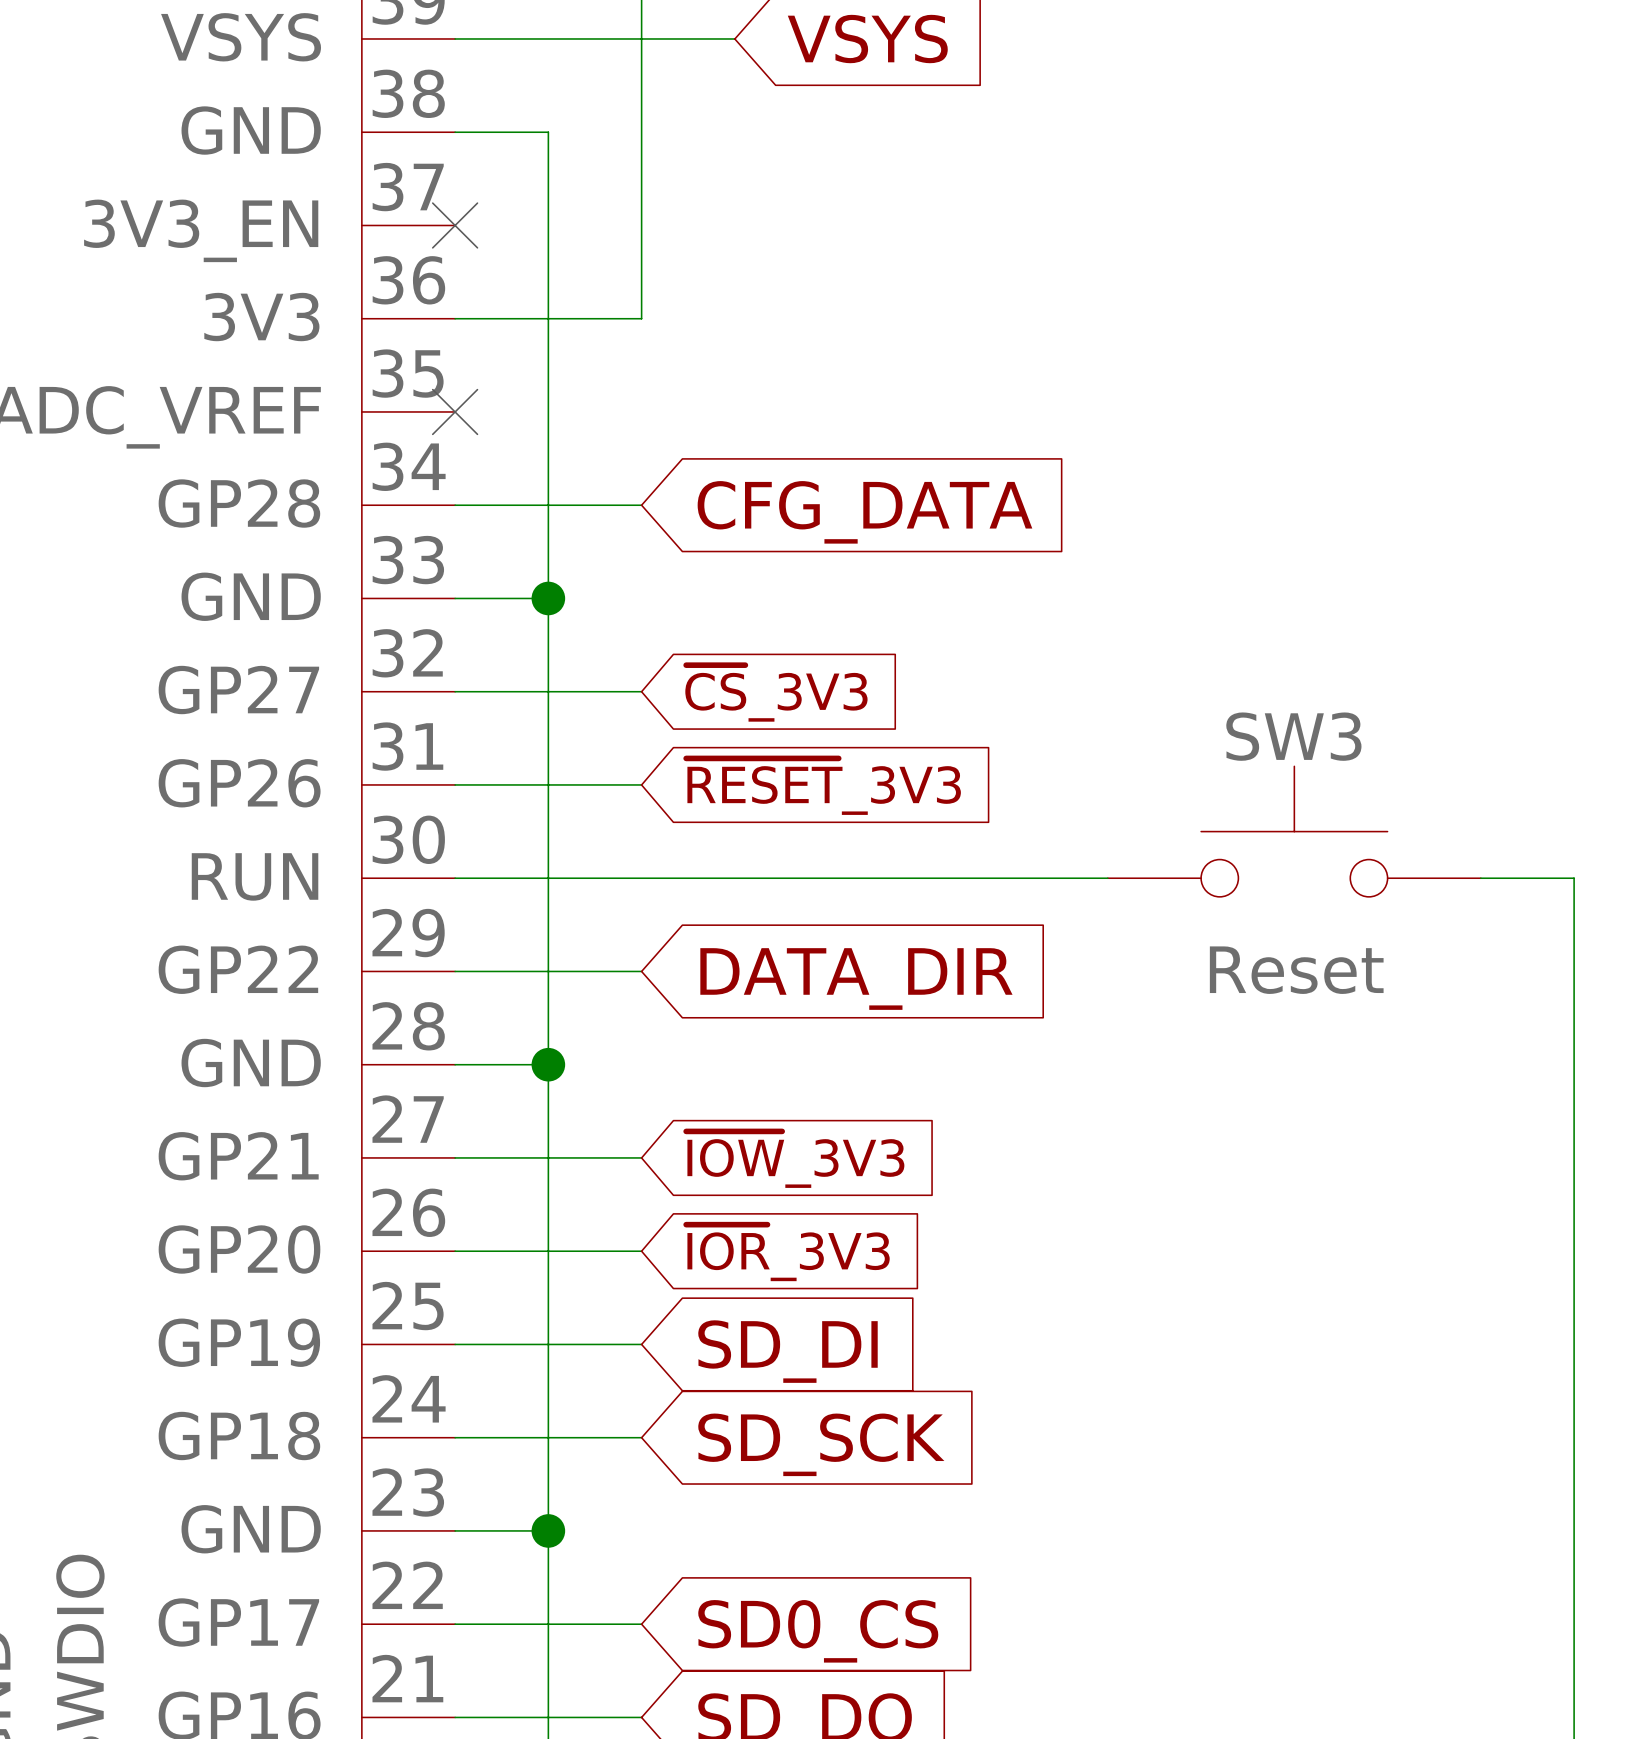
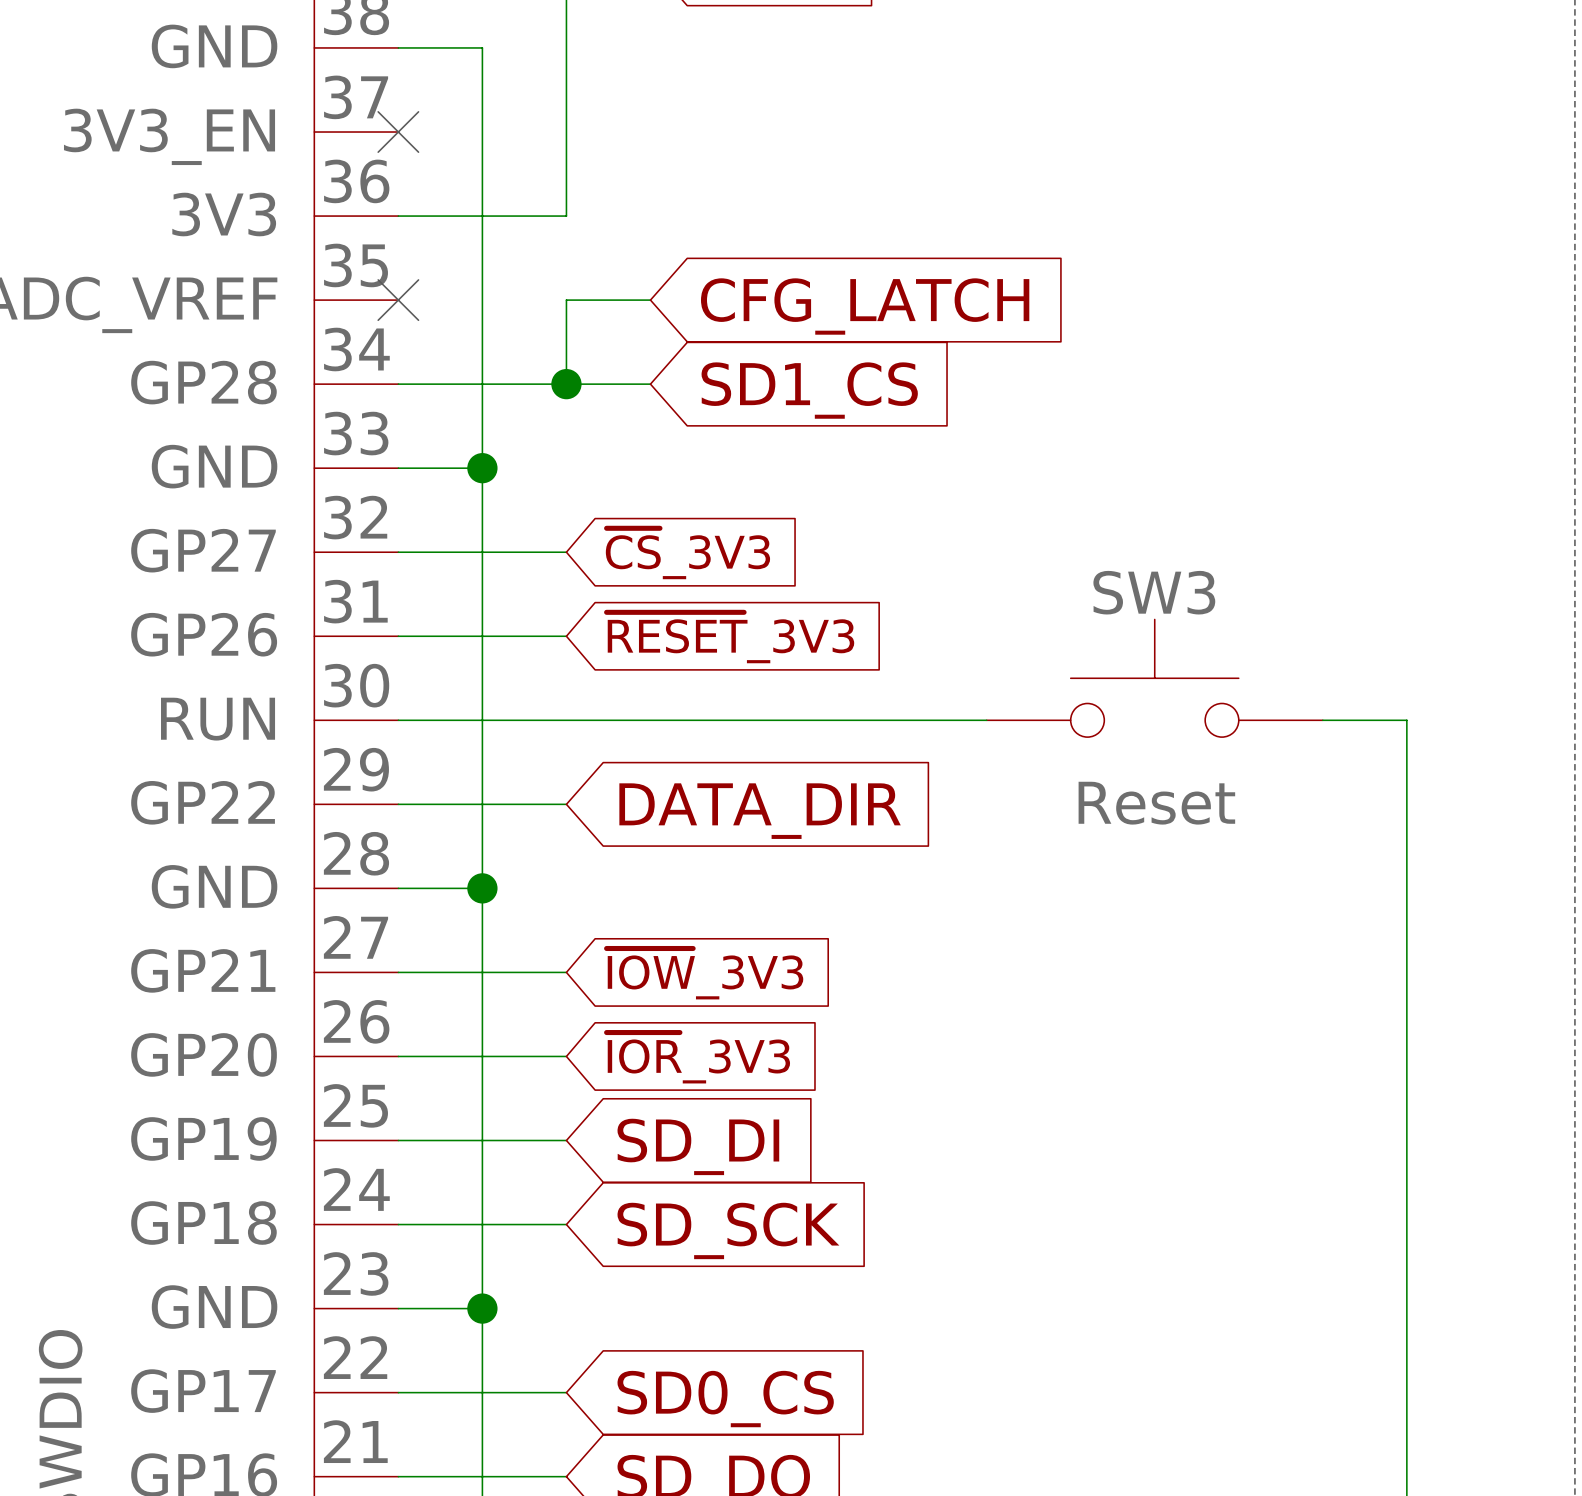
wire: none -> (650, 300) (566, 300) (566, 384) (650, 384)
junction: none -> (566, 384)
global label: CFG_DATA (864, 512) -> CFG_LATCH (865, 306)
global label: none -> SD1_CS (809, 390)

